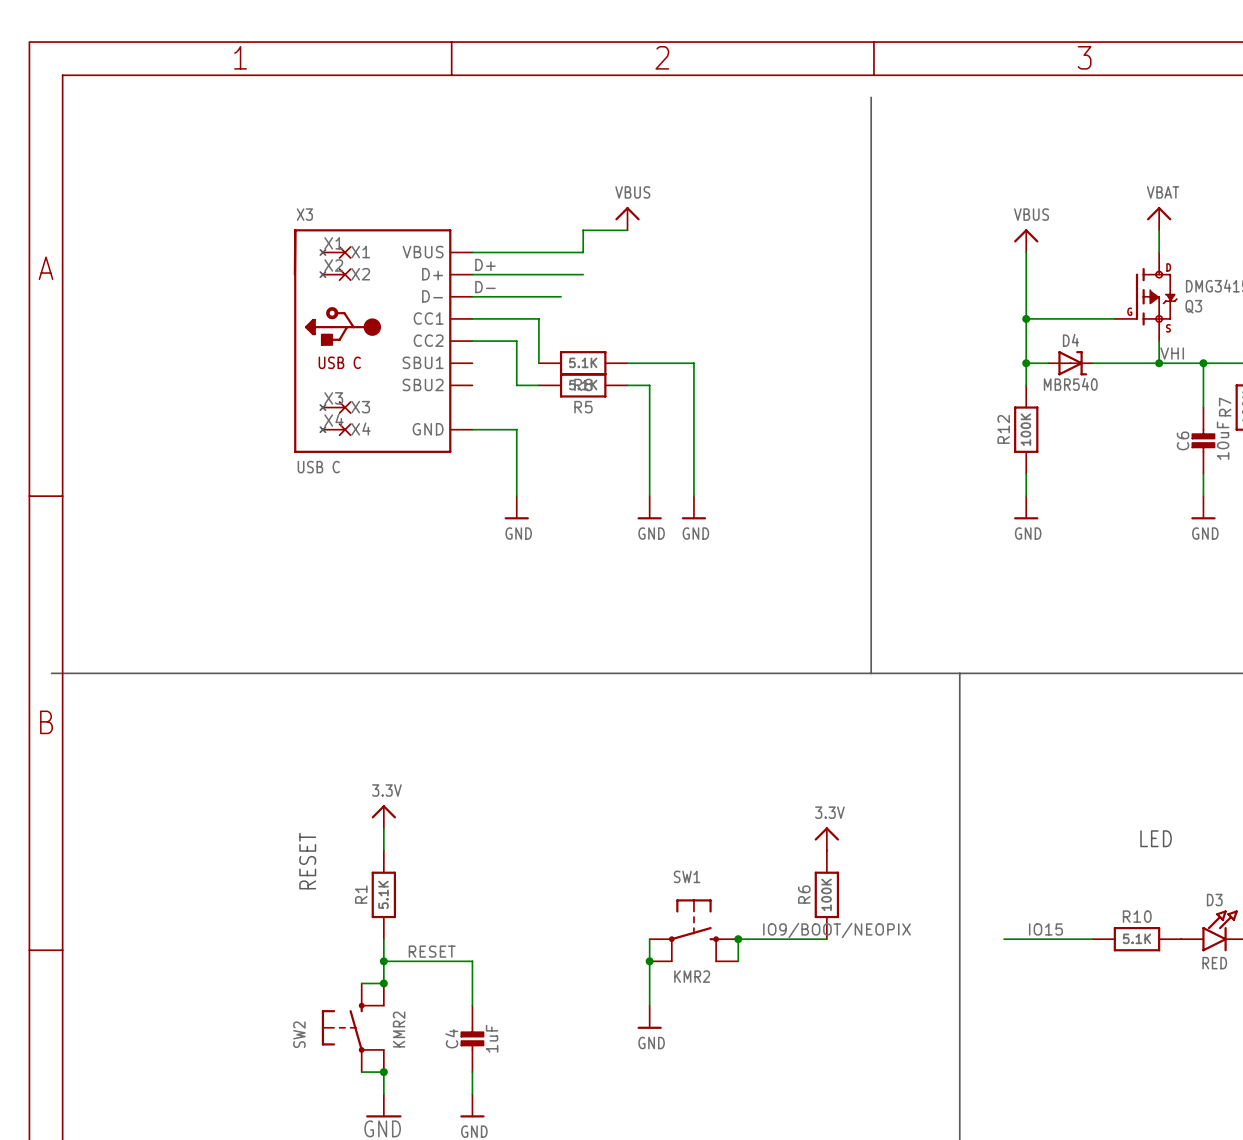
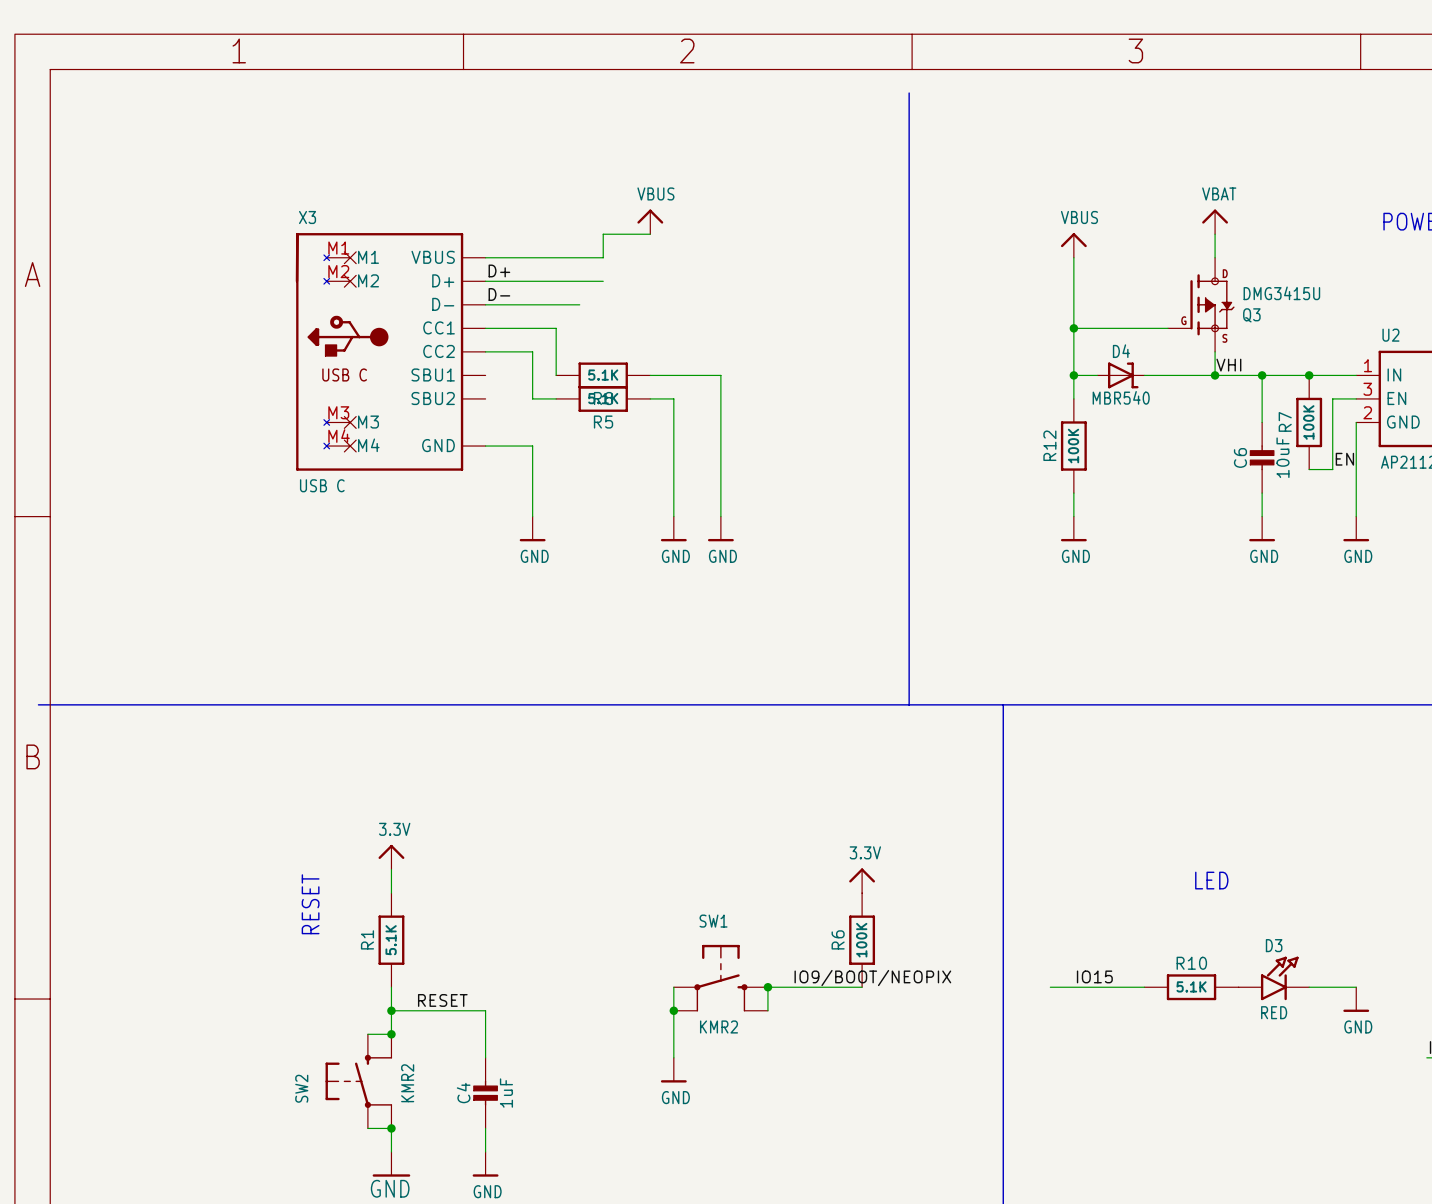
X3 pin number: X1 (333, 243) -> M1 (338, 248)
X3 pin name: X1 (360, 252) -> M1 (368, 257)
X3 pin number: X2 (333, 265) -> M2 (338, 271)
X3 pin name: X2 (360, 274) -> M2 (368, 280)
X3 pin number: X3 (333, 398) -> M3 (338, 412)
X3 pin name: X3 (360, 407) -> M3 (368, 422)
X3 pin number: X4 (334, 420) -> M4 (339, 436)
X3 pin name: X4 (360, 429) -> M4 (368, 445)

